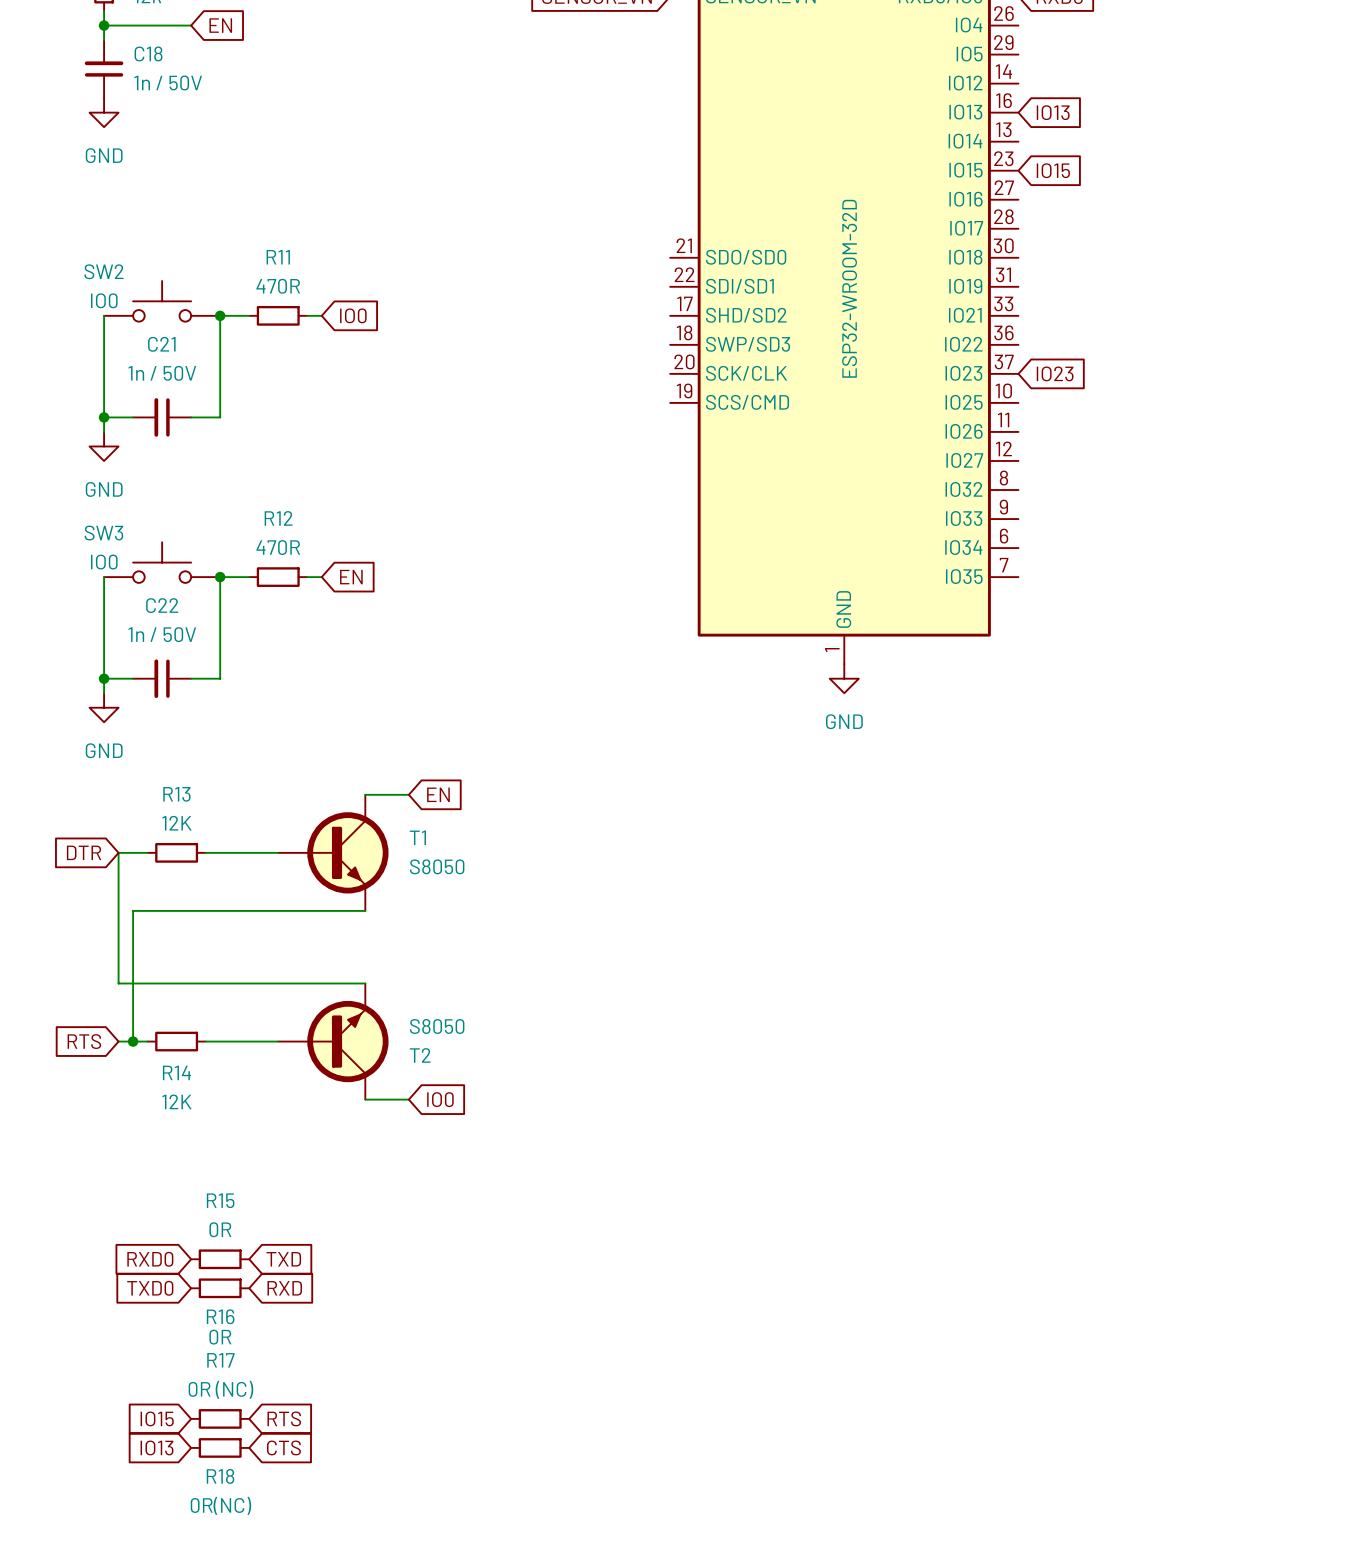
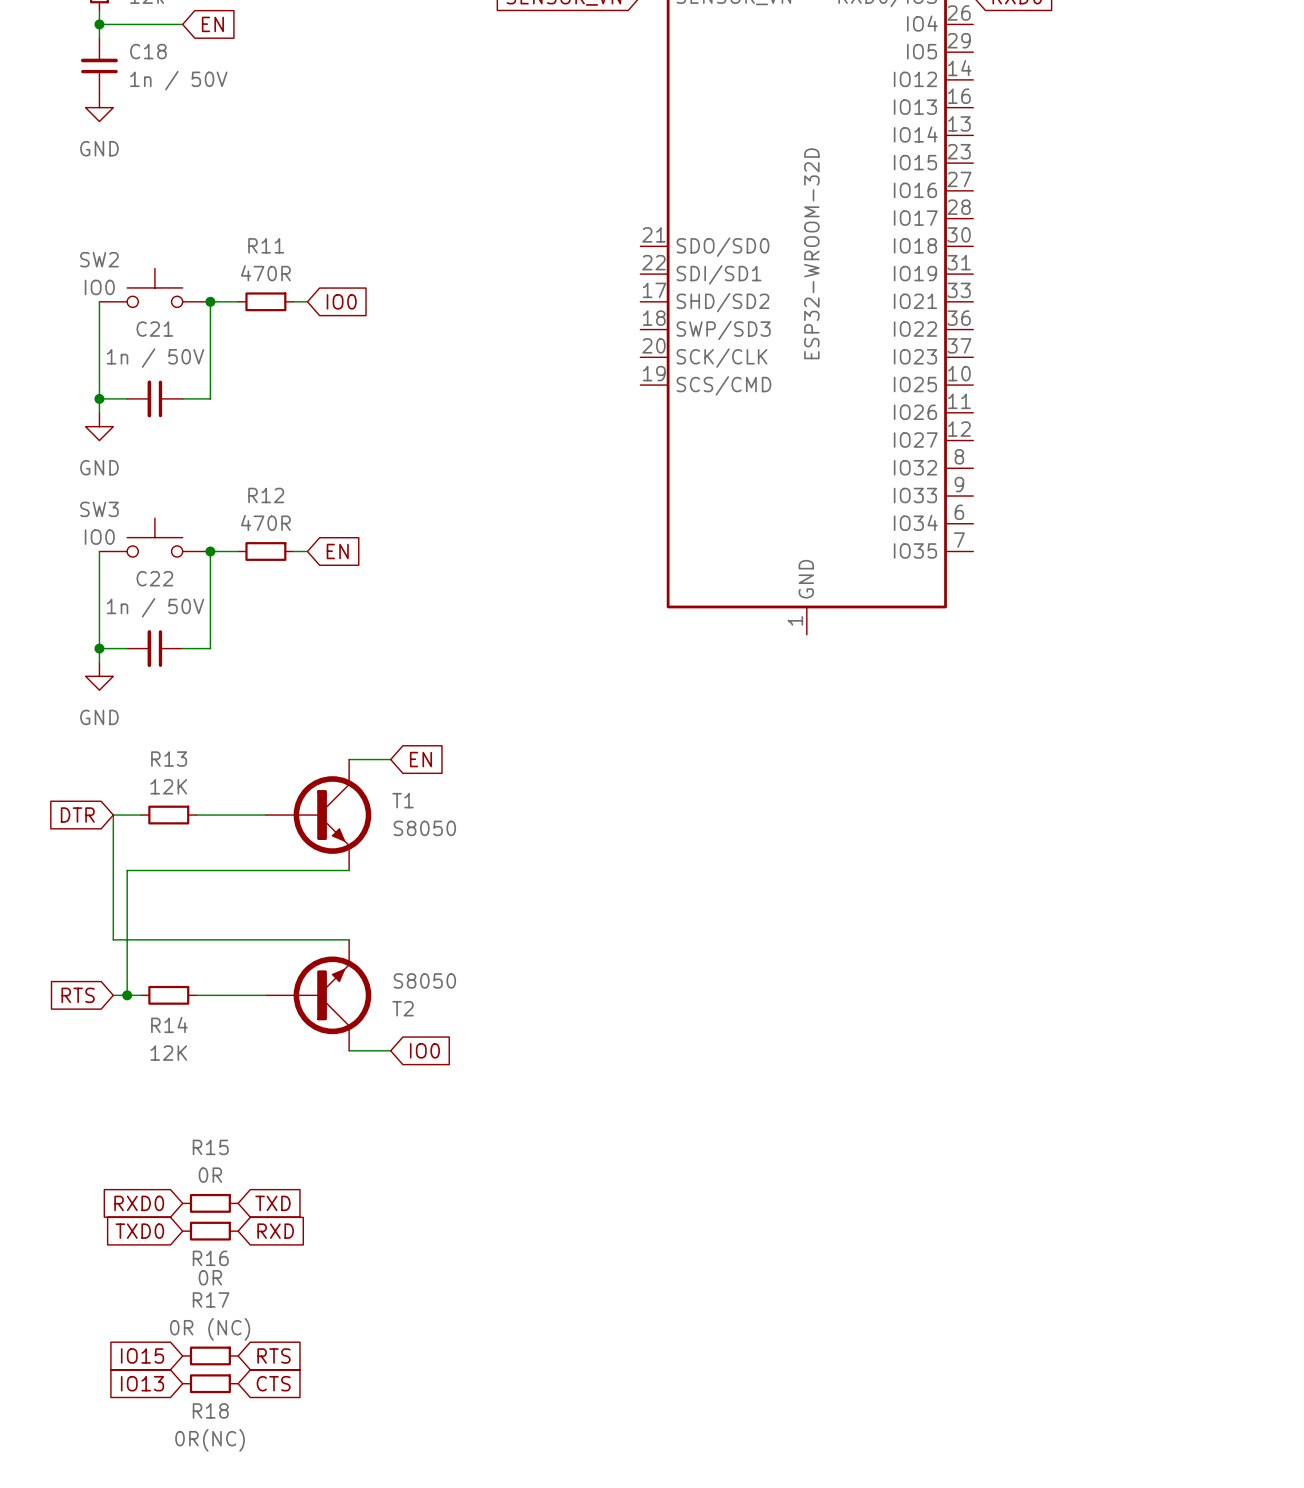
global label: IO13 (1053, 112) -> none
global label: IO15 (1053, 170) -> none
global label: IO23 (1055, 373) -> none
power symbol: GND (844, 678) -> none

